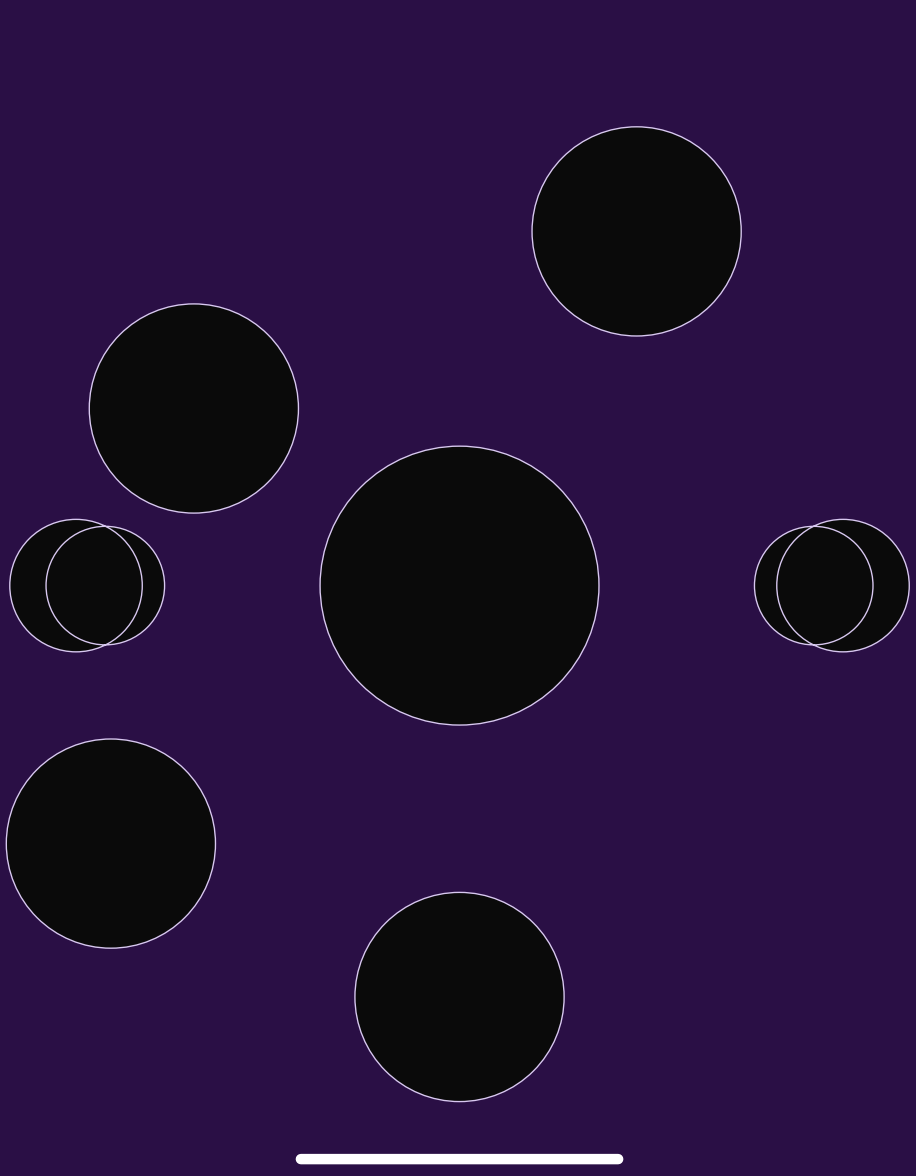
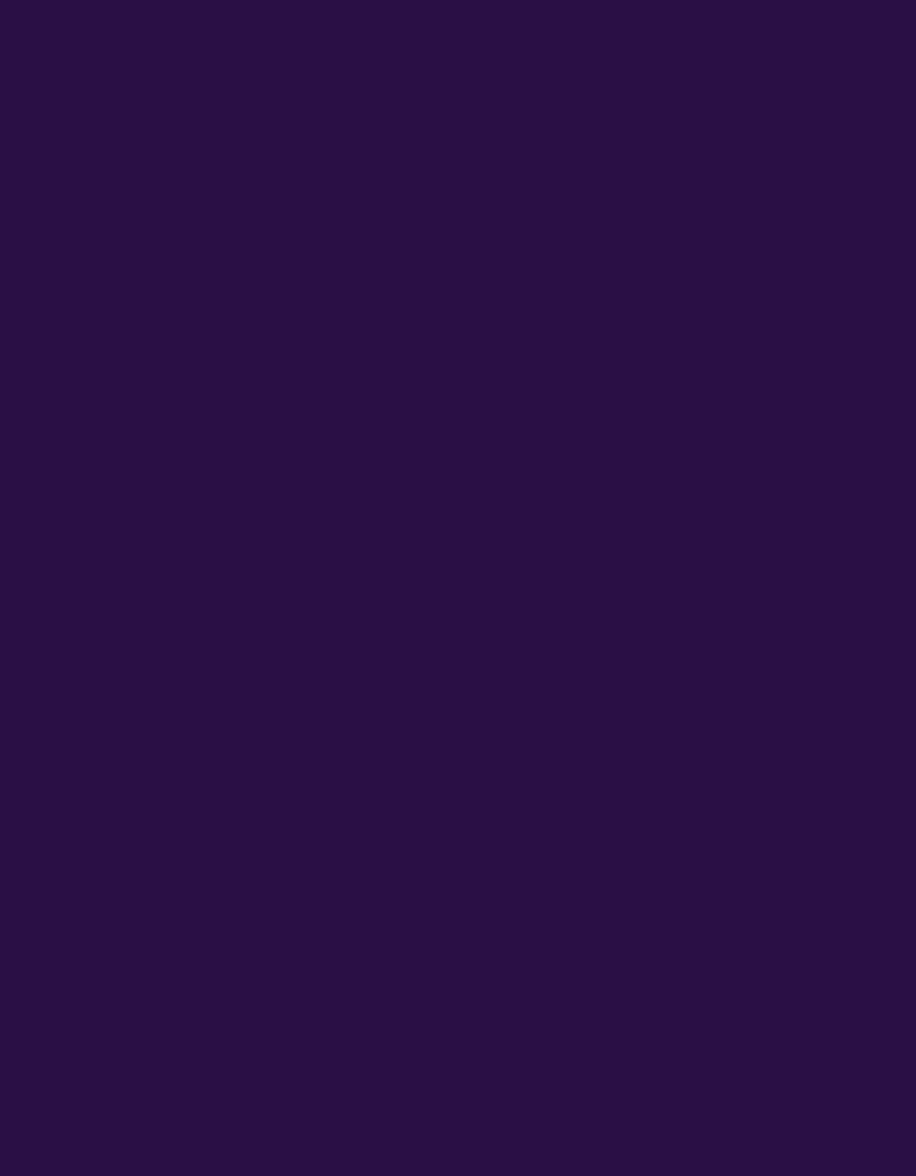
part: (457, 645) -> none

